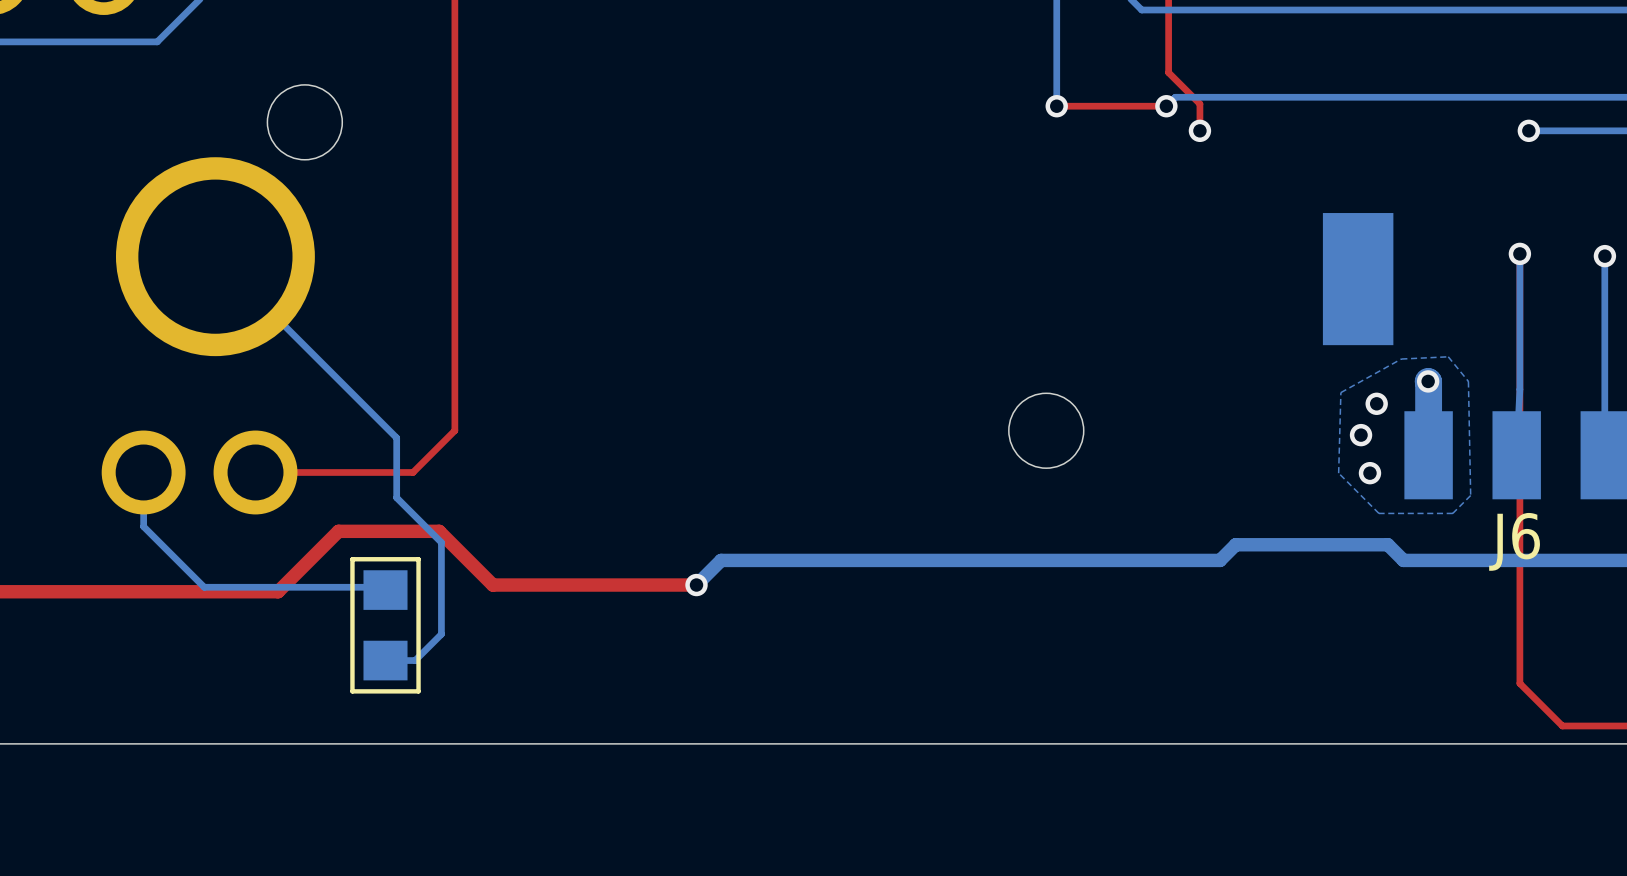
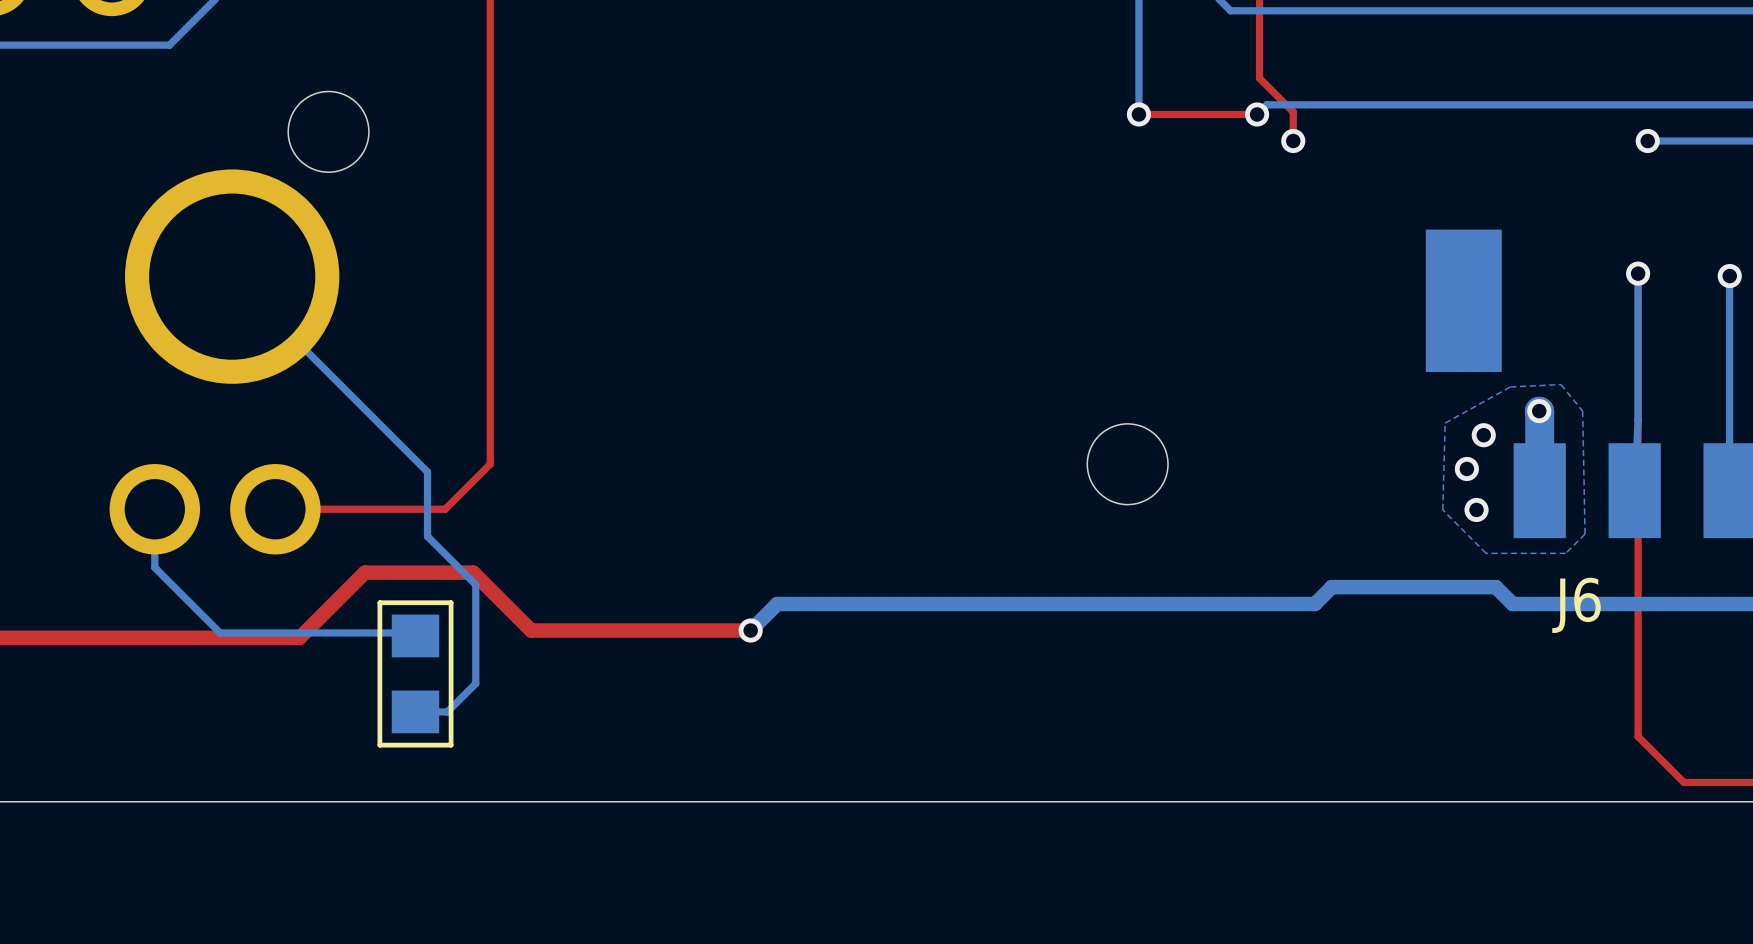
J6 name position: J6 (1514, 541) -> J6 (1576, 605)

